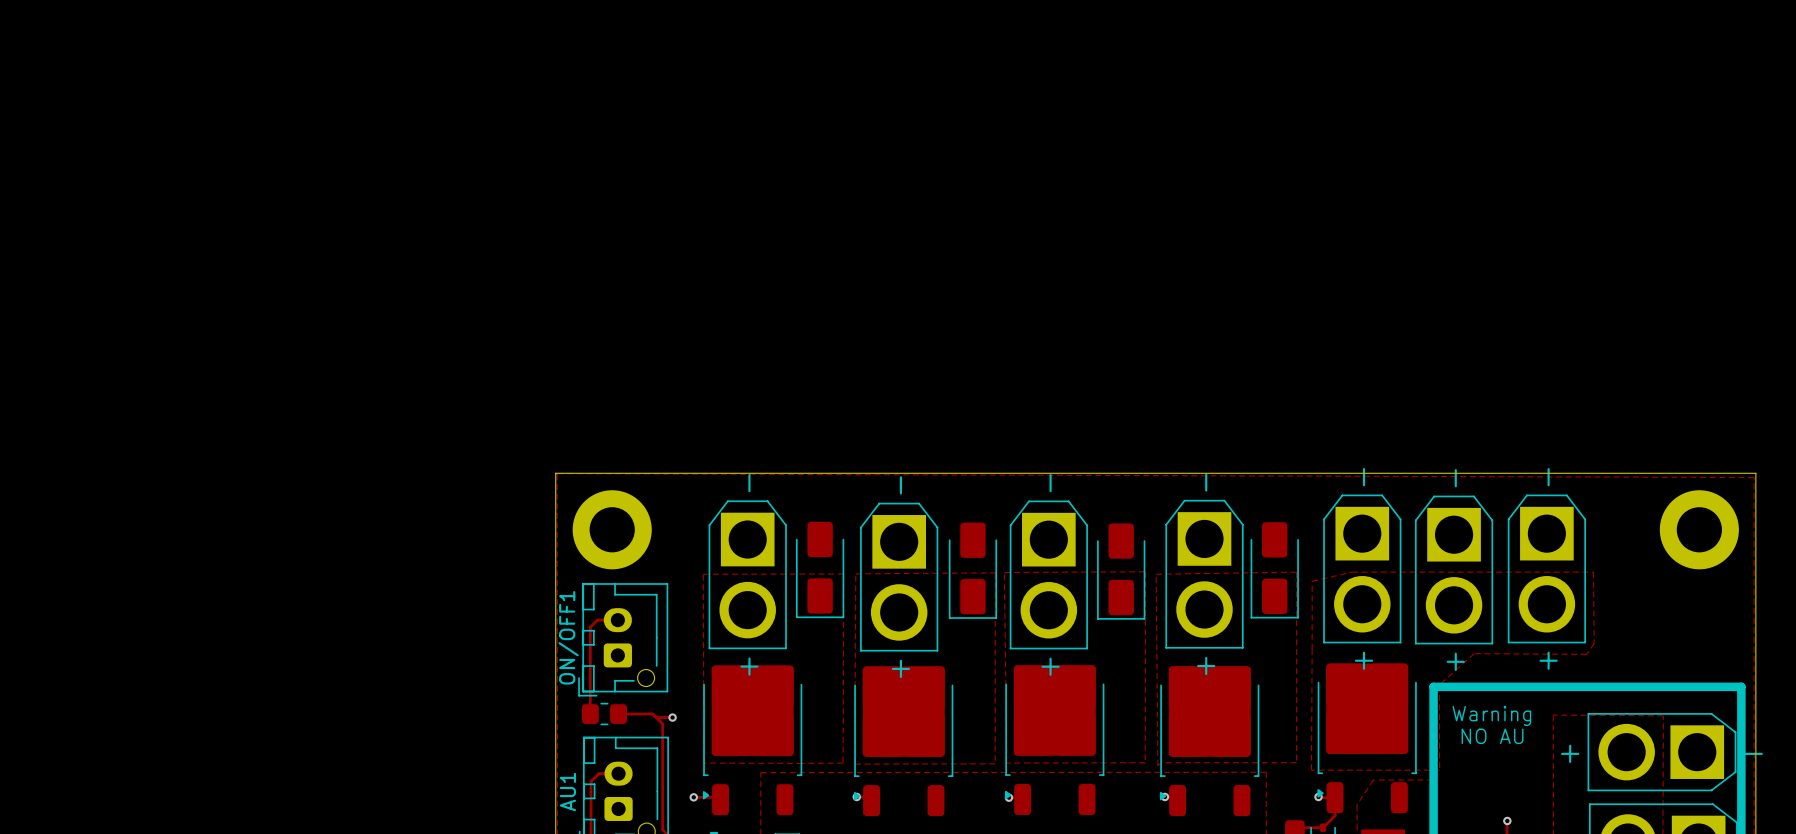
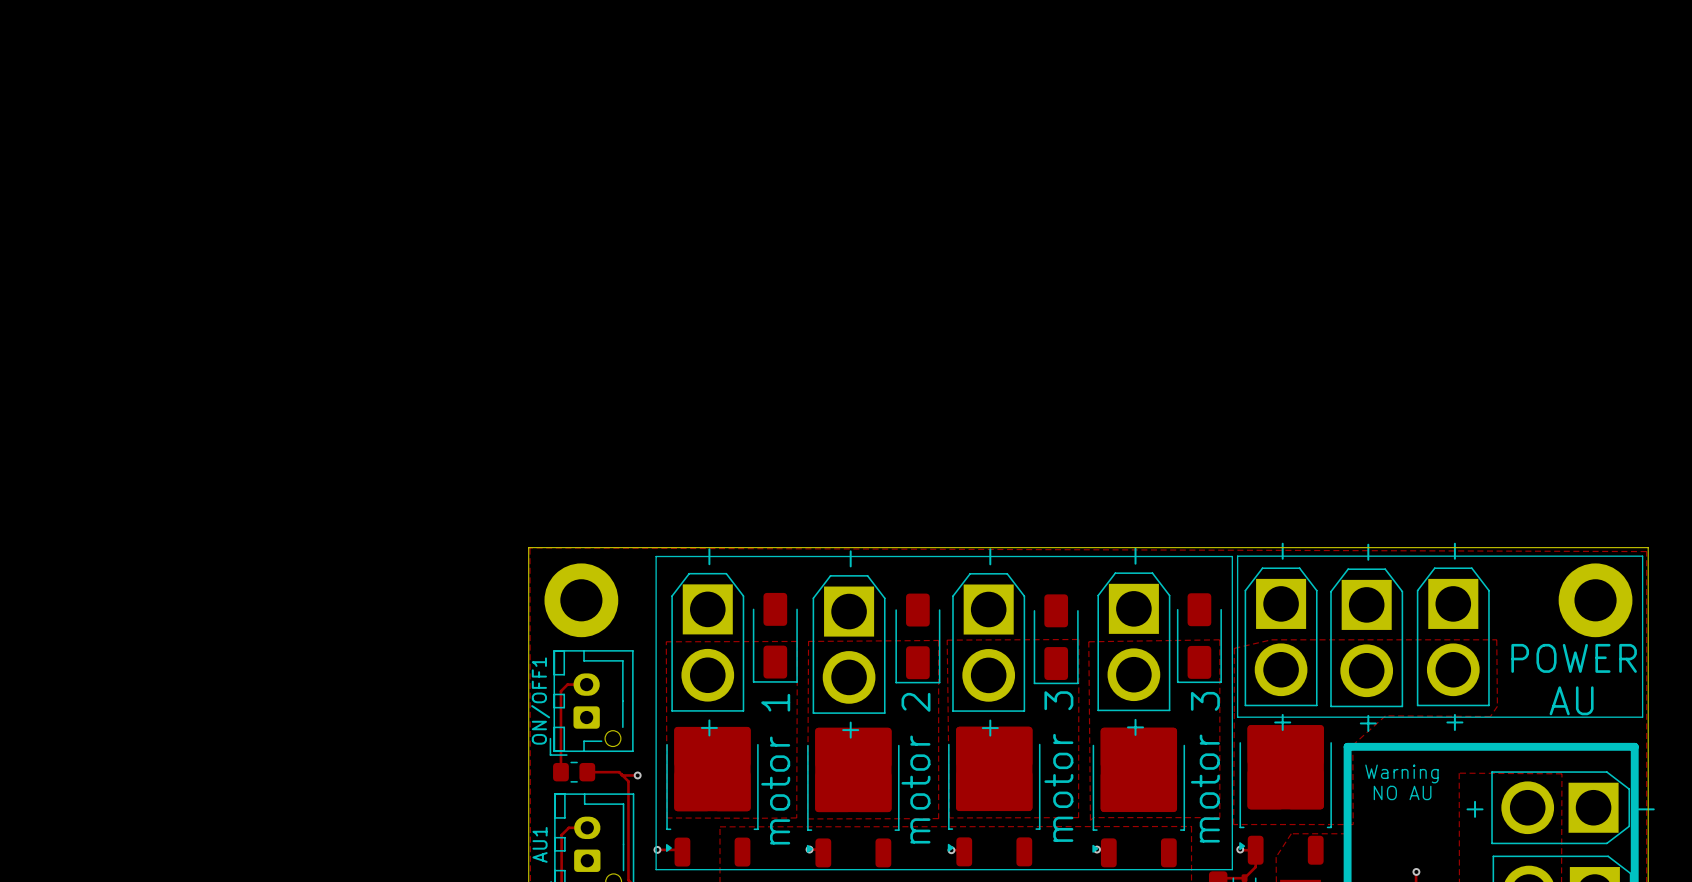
line: none -> (656, 556) (1232, 556) (1232, 869) (656, 869) (656, 556)
line: none -> (1237, 556) (1642, 556) (1642, 717) (1237, 717) (1237, 556)
text: none -> POWER (1574, 658)
text: none -> AU (1571, 700)
text: none -> motor 3 (1058, 766)
text: none -> motor 3 (1205, 767)
text: none -> motor 2 (915, 768)
text: none -> motor 1 (775, 769)

